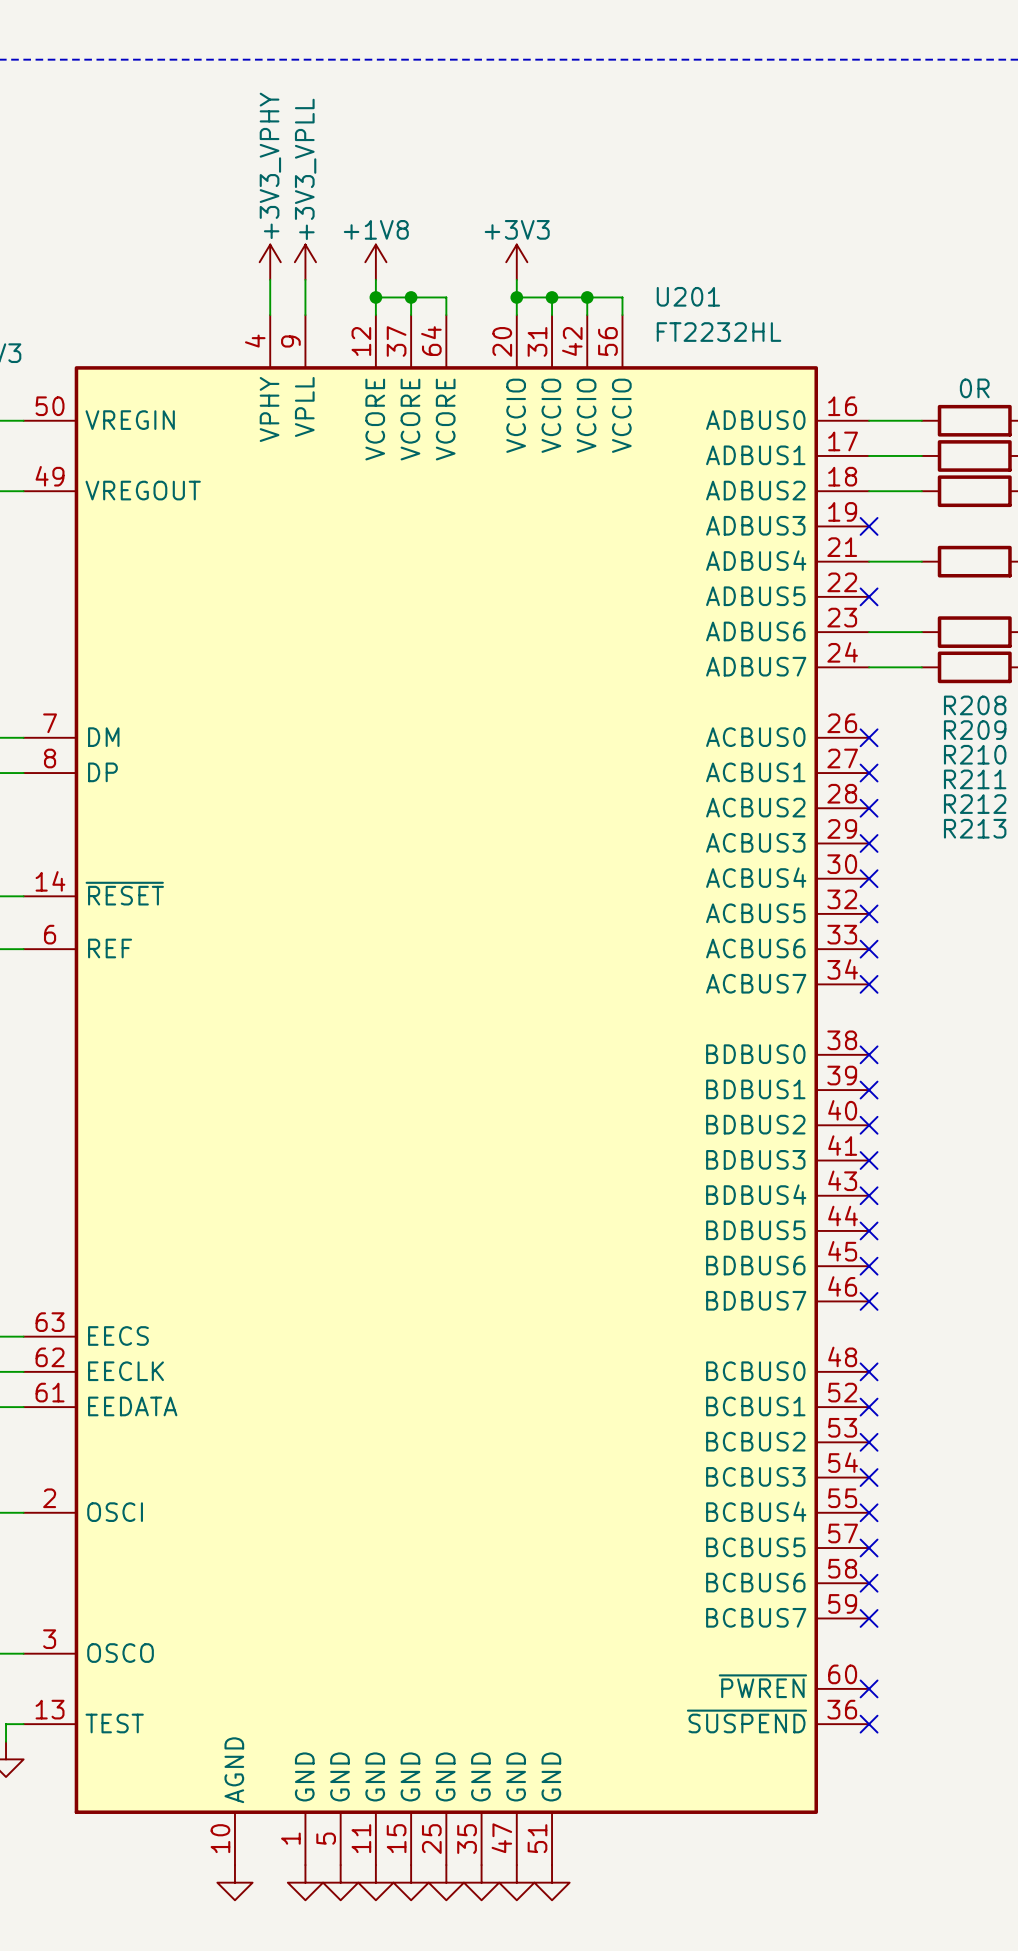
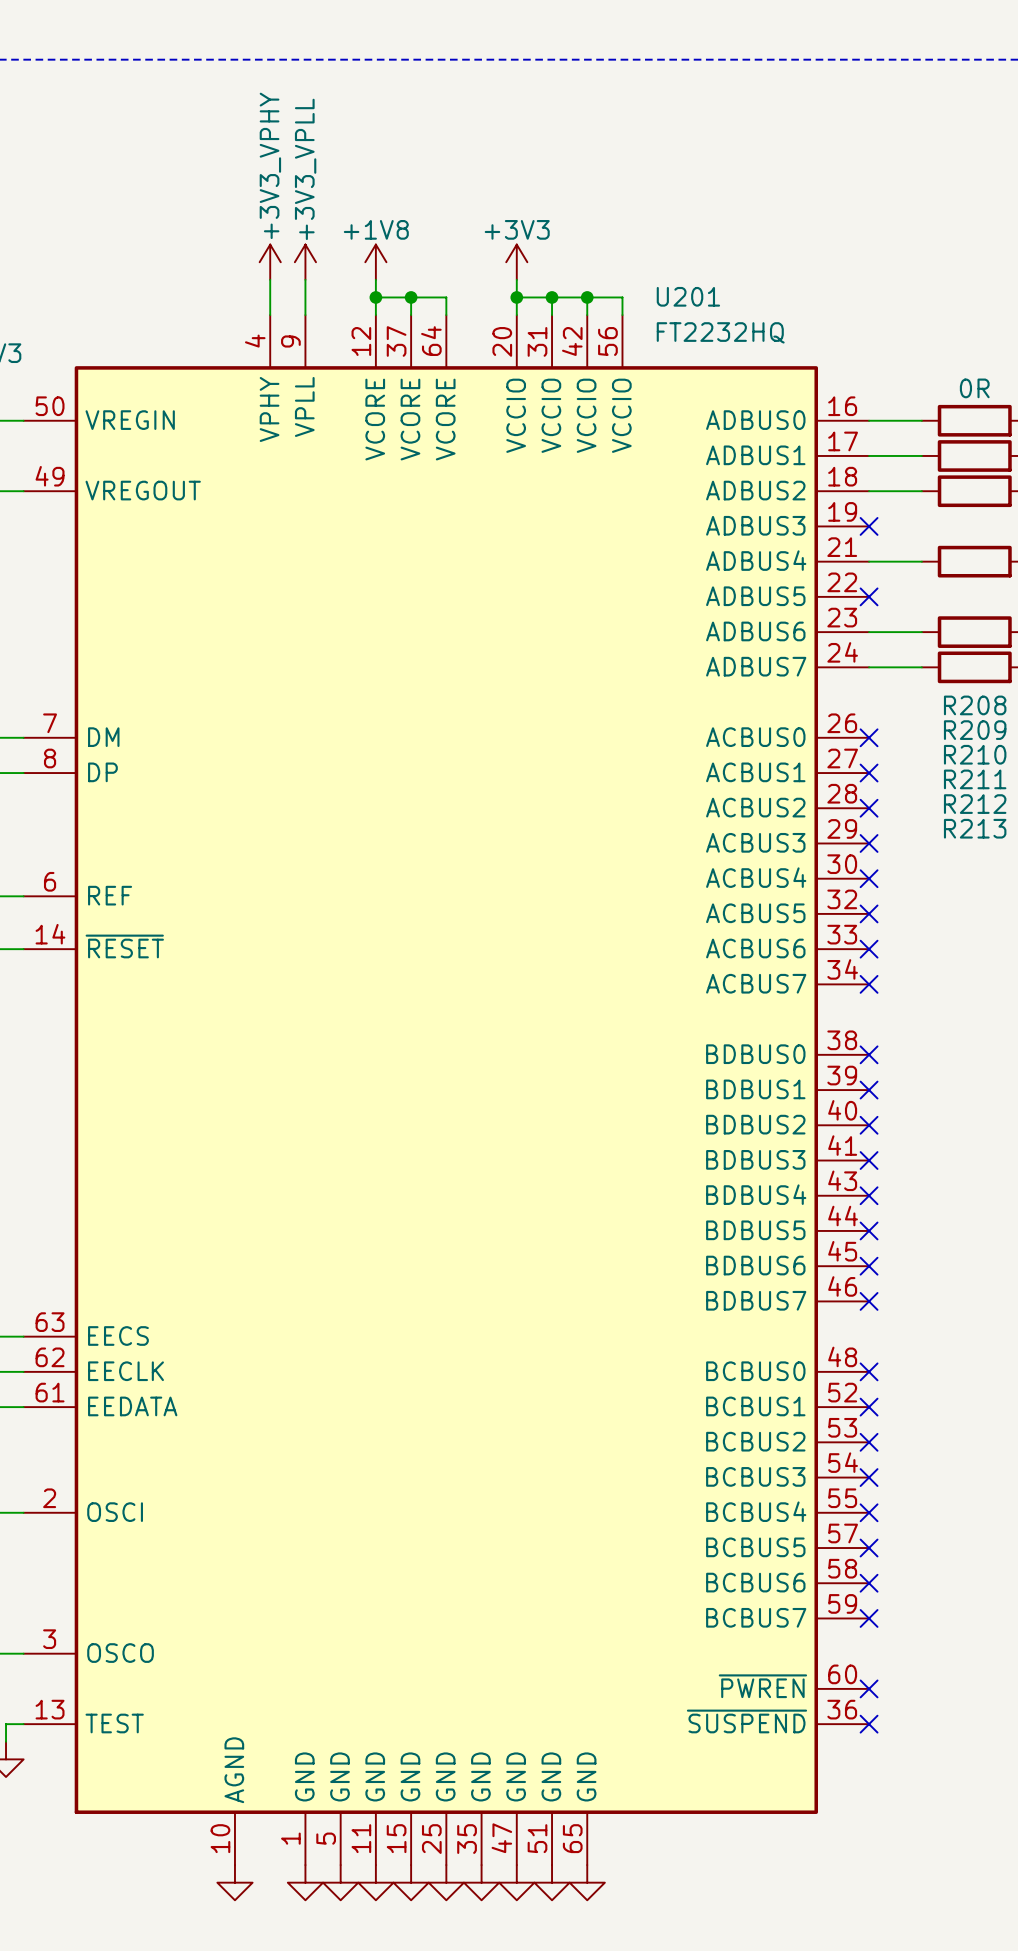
U201 symbol: [23, 315, 870, 1866] -> [23, 315, 870, 1866]
U201 value: FT2232HL (719, 332) -> FT2232HQ (720, 332)
power symbol: none -> (587, 1882)

